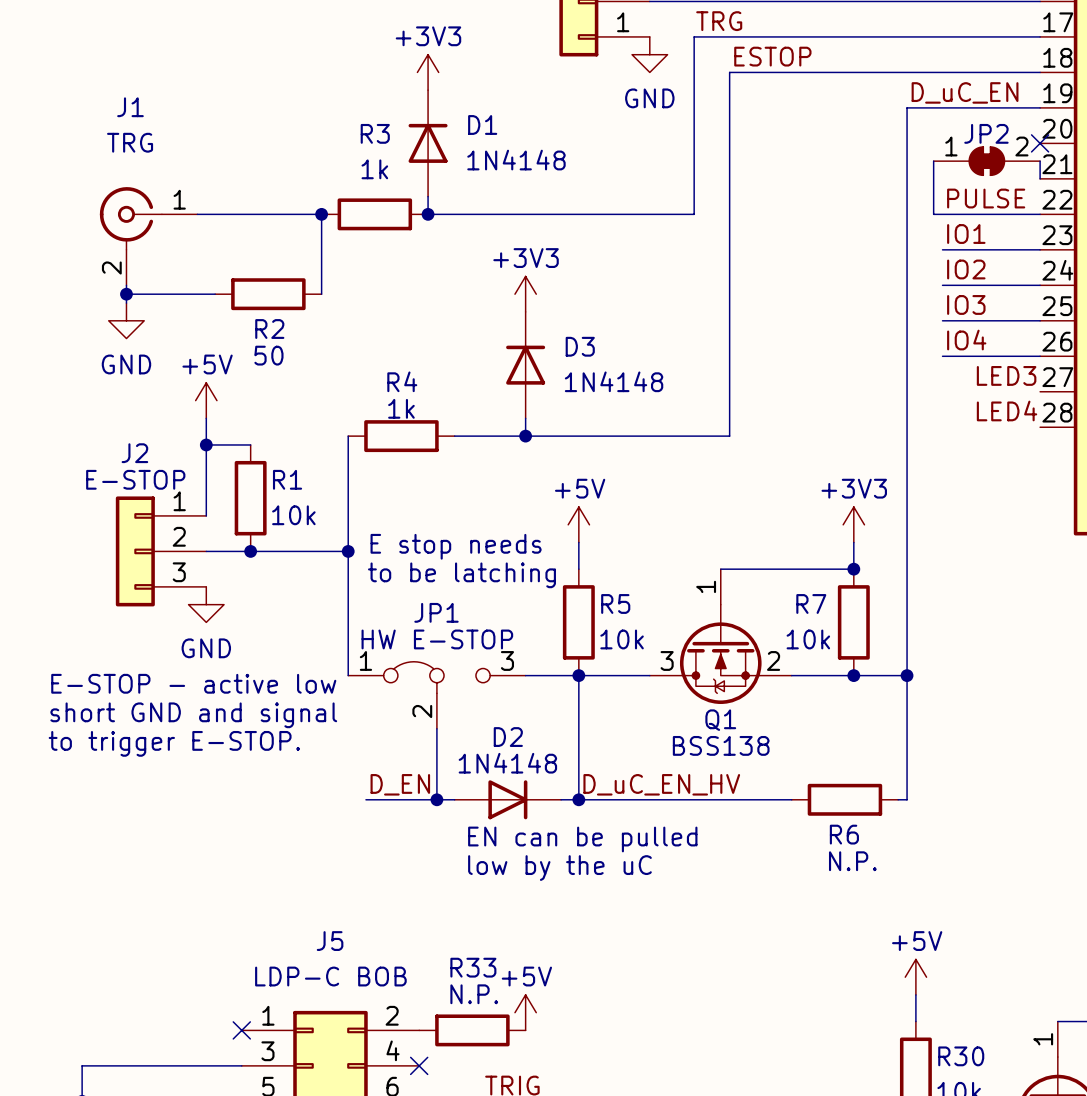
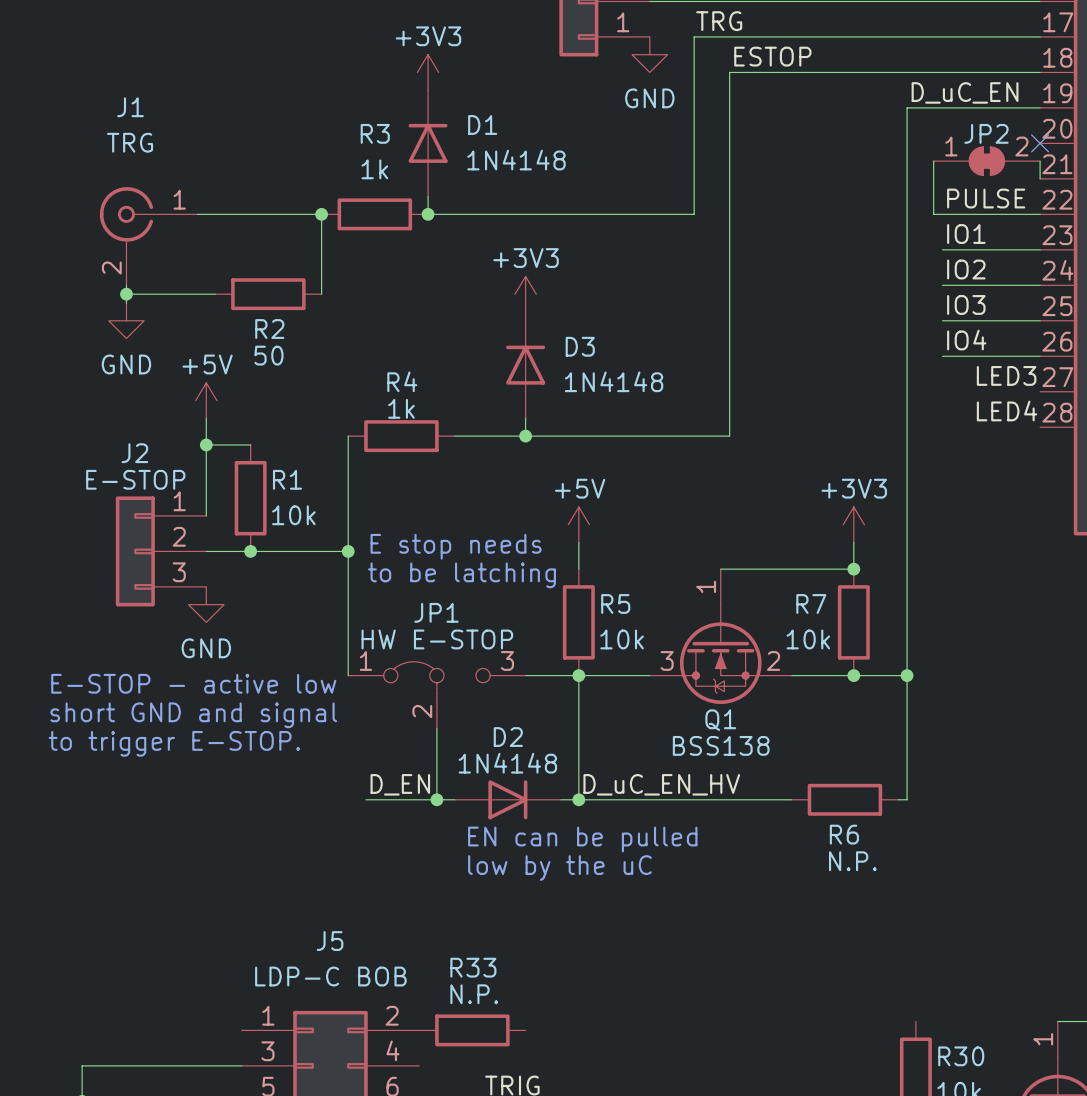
power symbol: +5V (915, 977) -> none
wire: (915, 994) (915, 1021) -> none
power symbol: +5V (525, 1012) -> none
no-connect mark: (241, 1030) -> none
no-connect mark: (419, 1065) -> none

